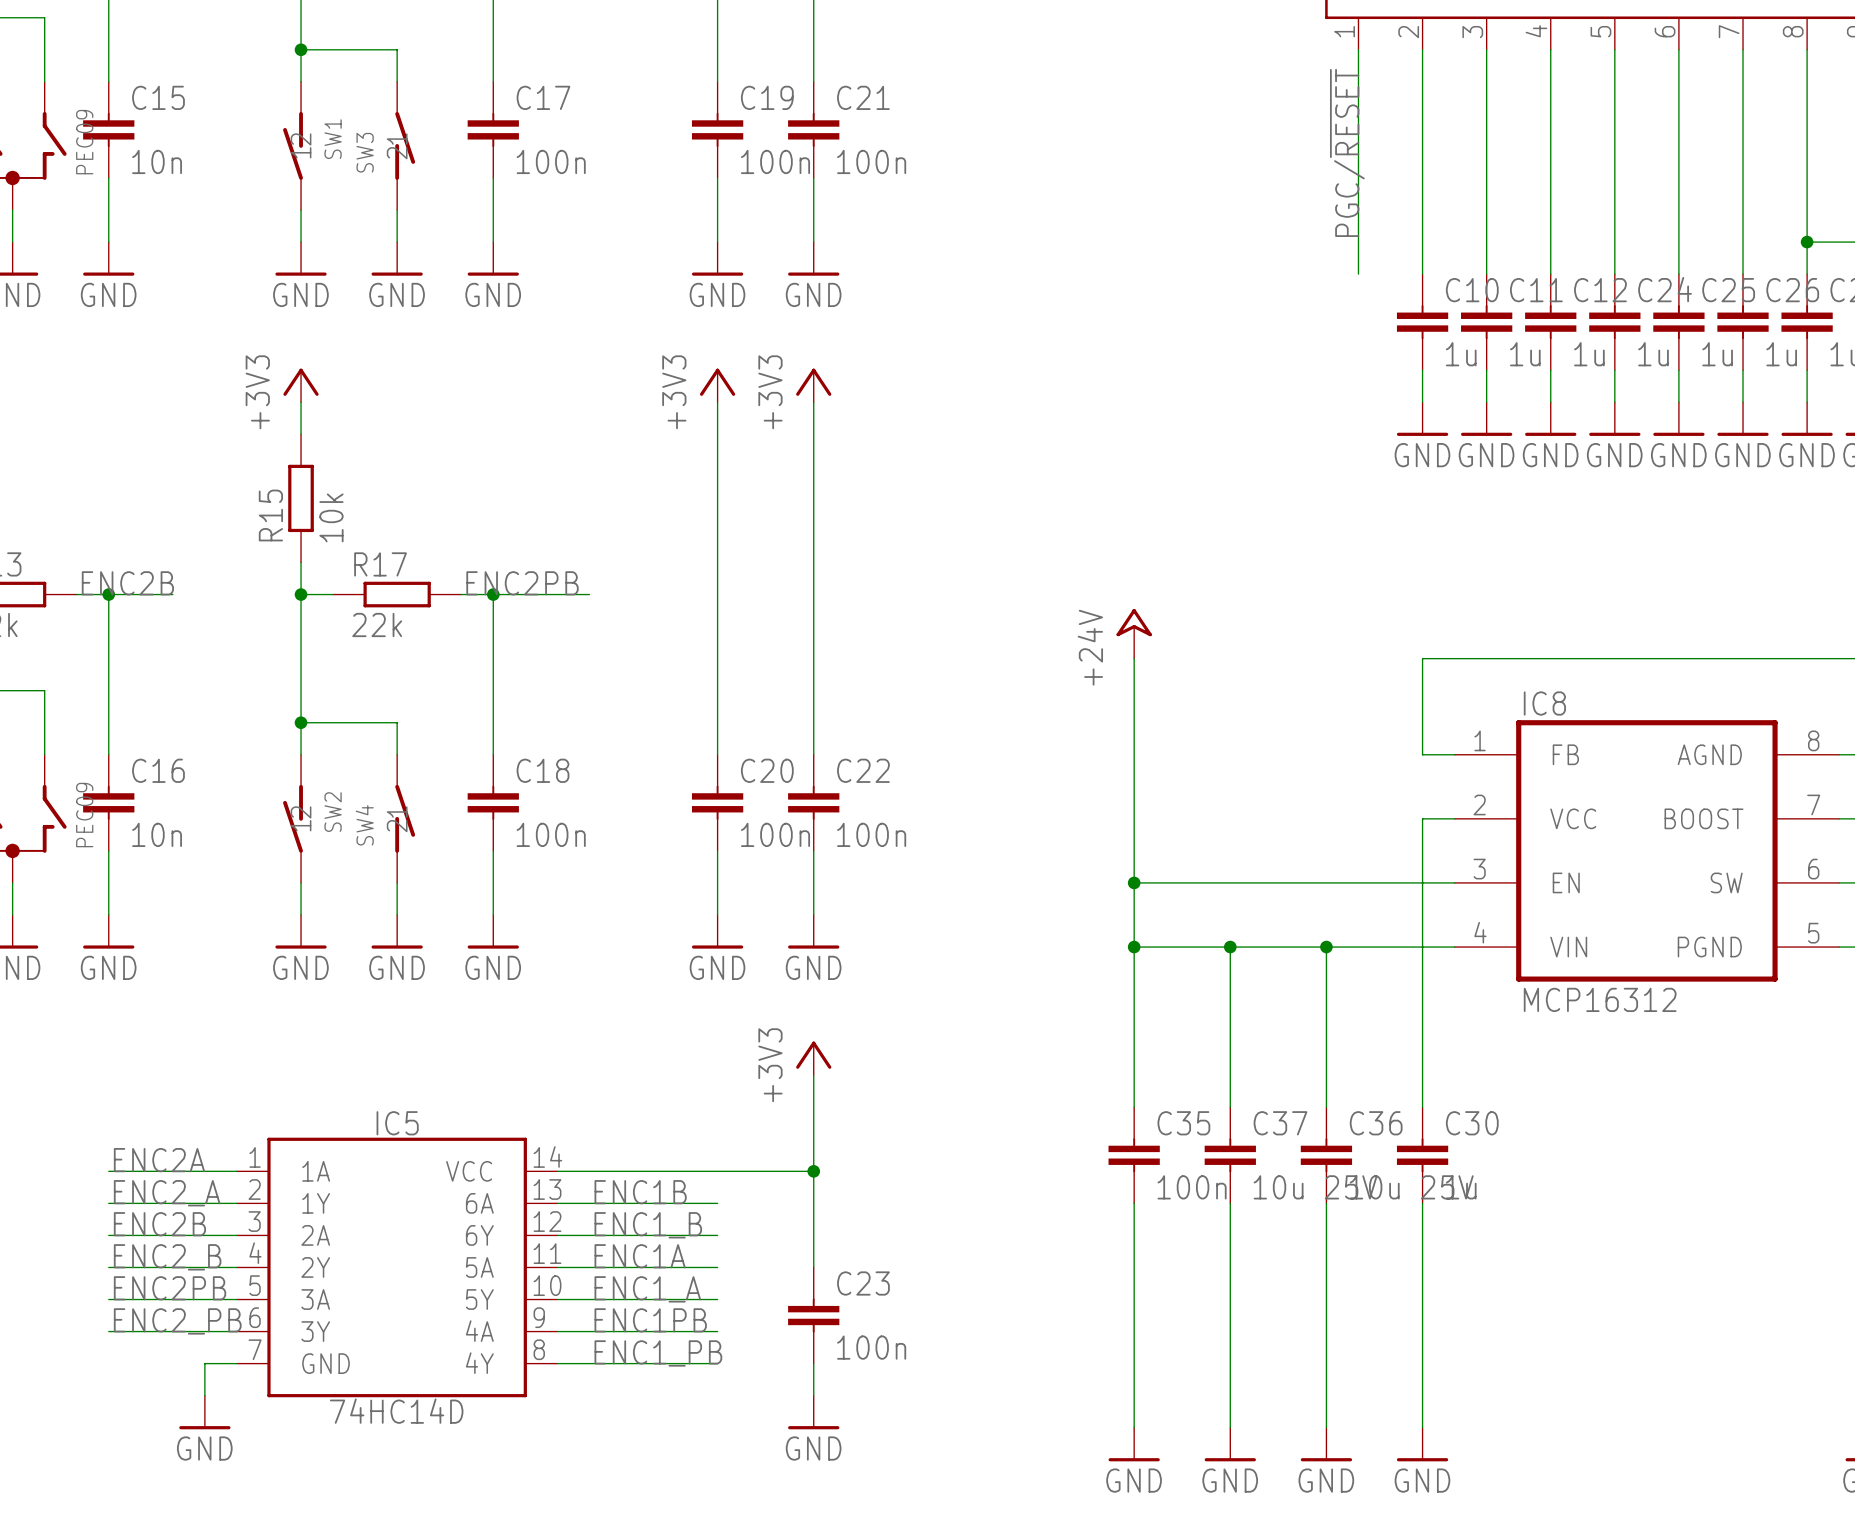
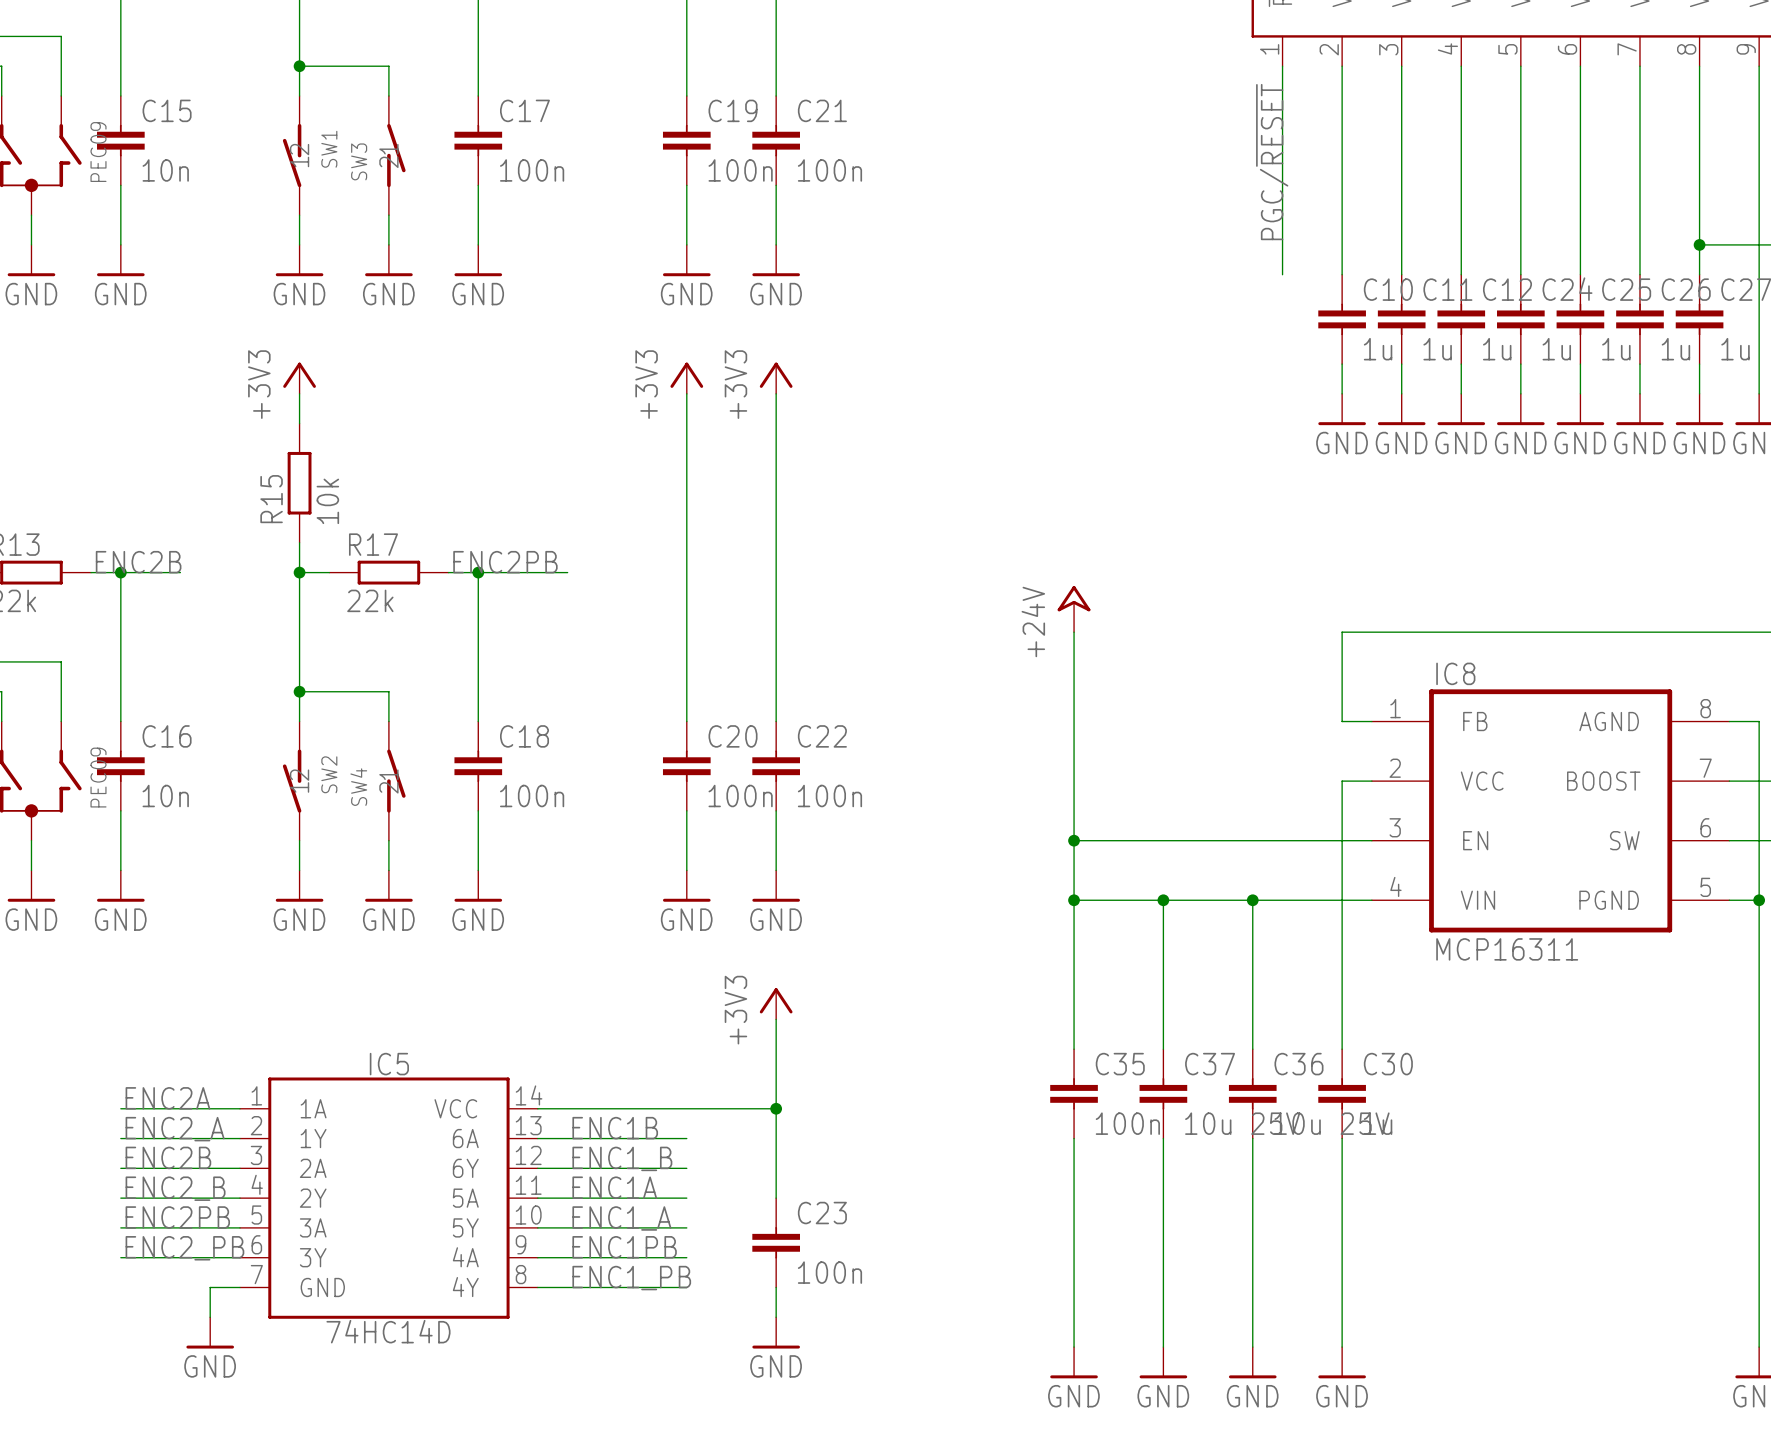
IC8 value: MCP16312 (1600, 999) -> MCP16311 (1507, 949)

